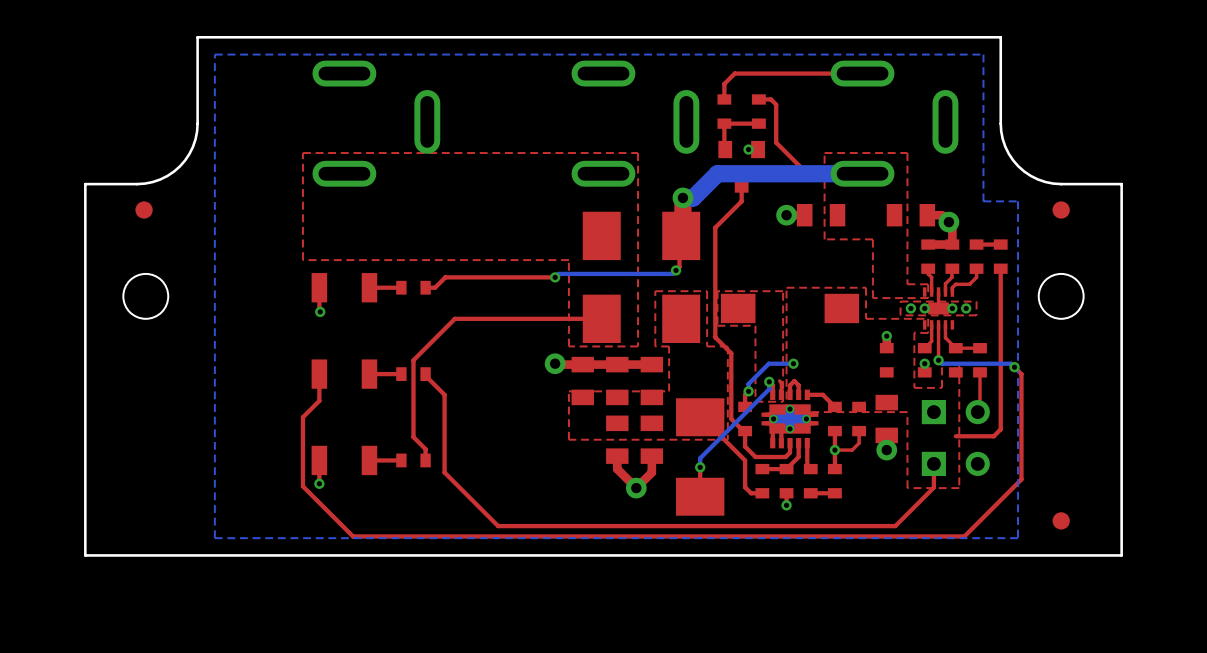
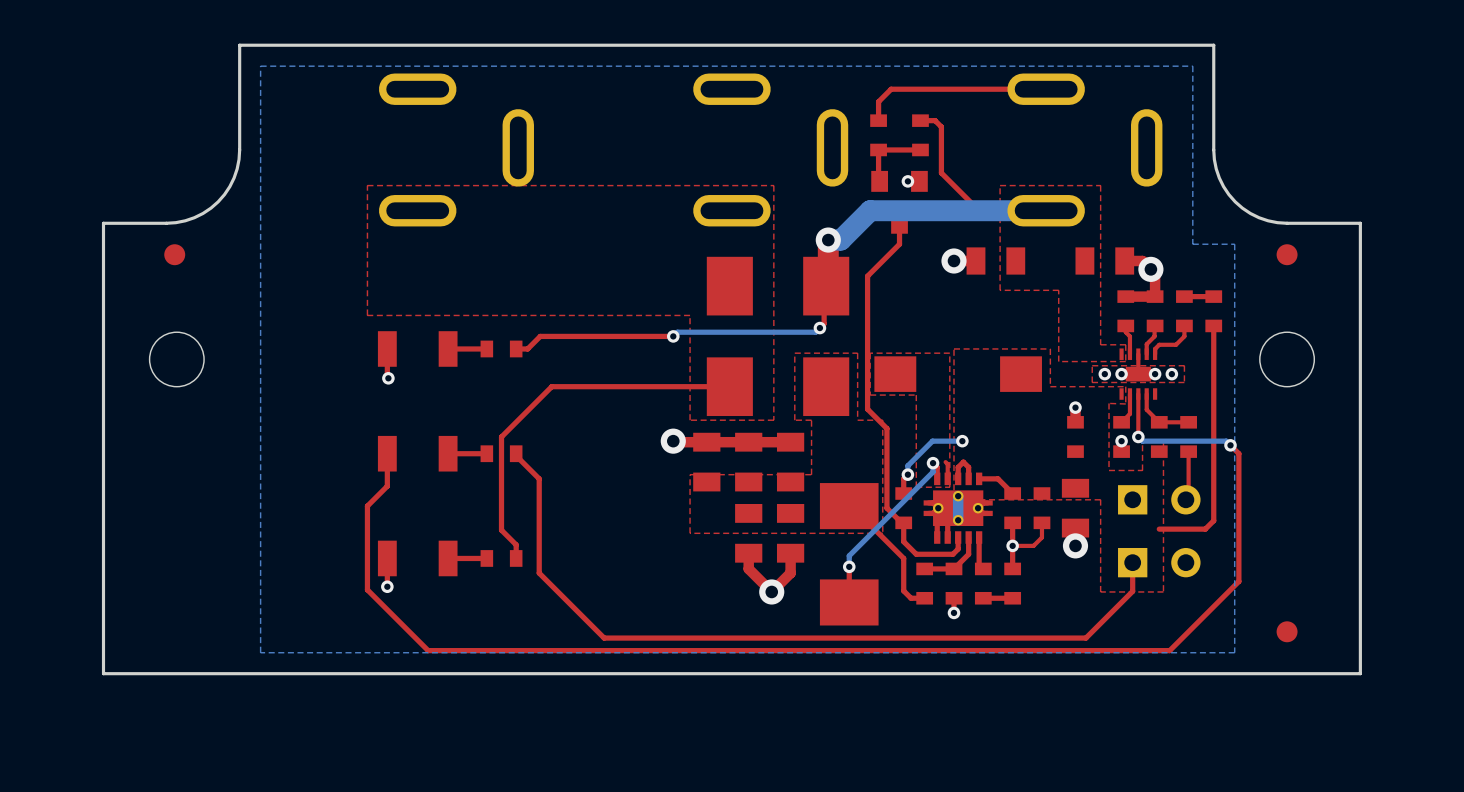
bottom track: (806, 419) (773, 419) -> none

